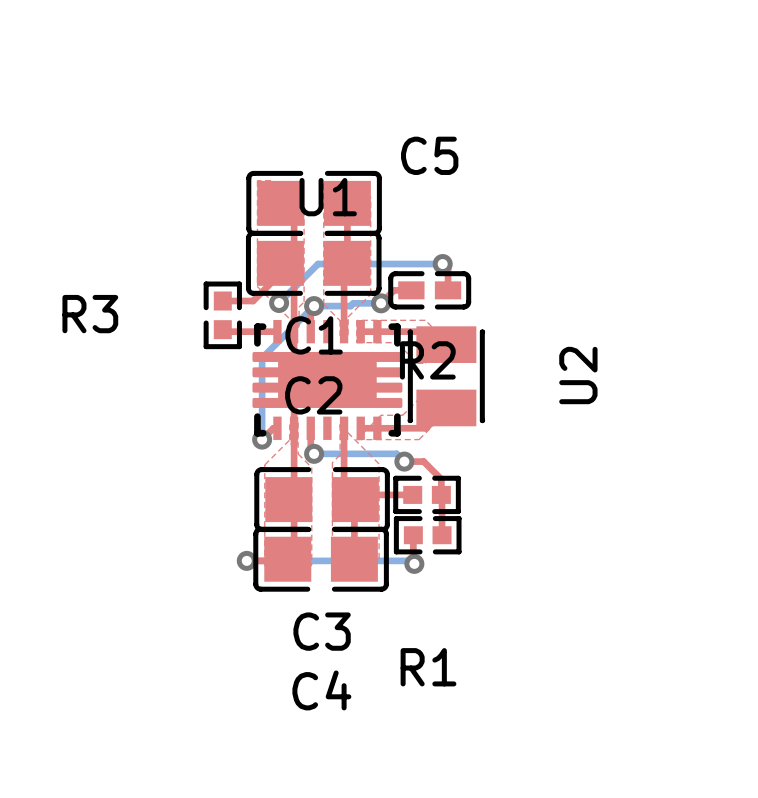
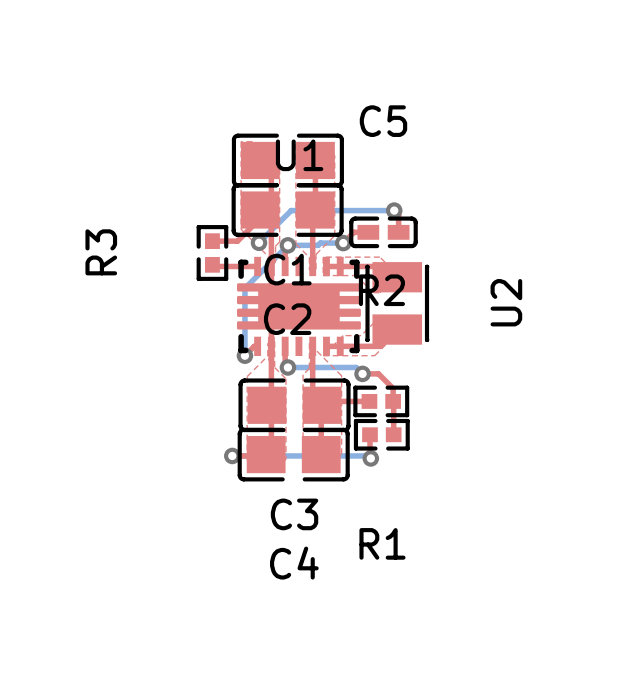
R3 name rotation: 0° (90, 314) -> 90° counterclockwise (101, 252)

